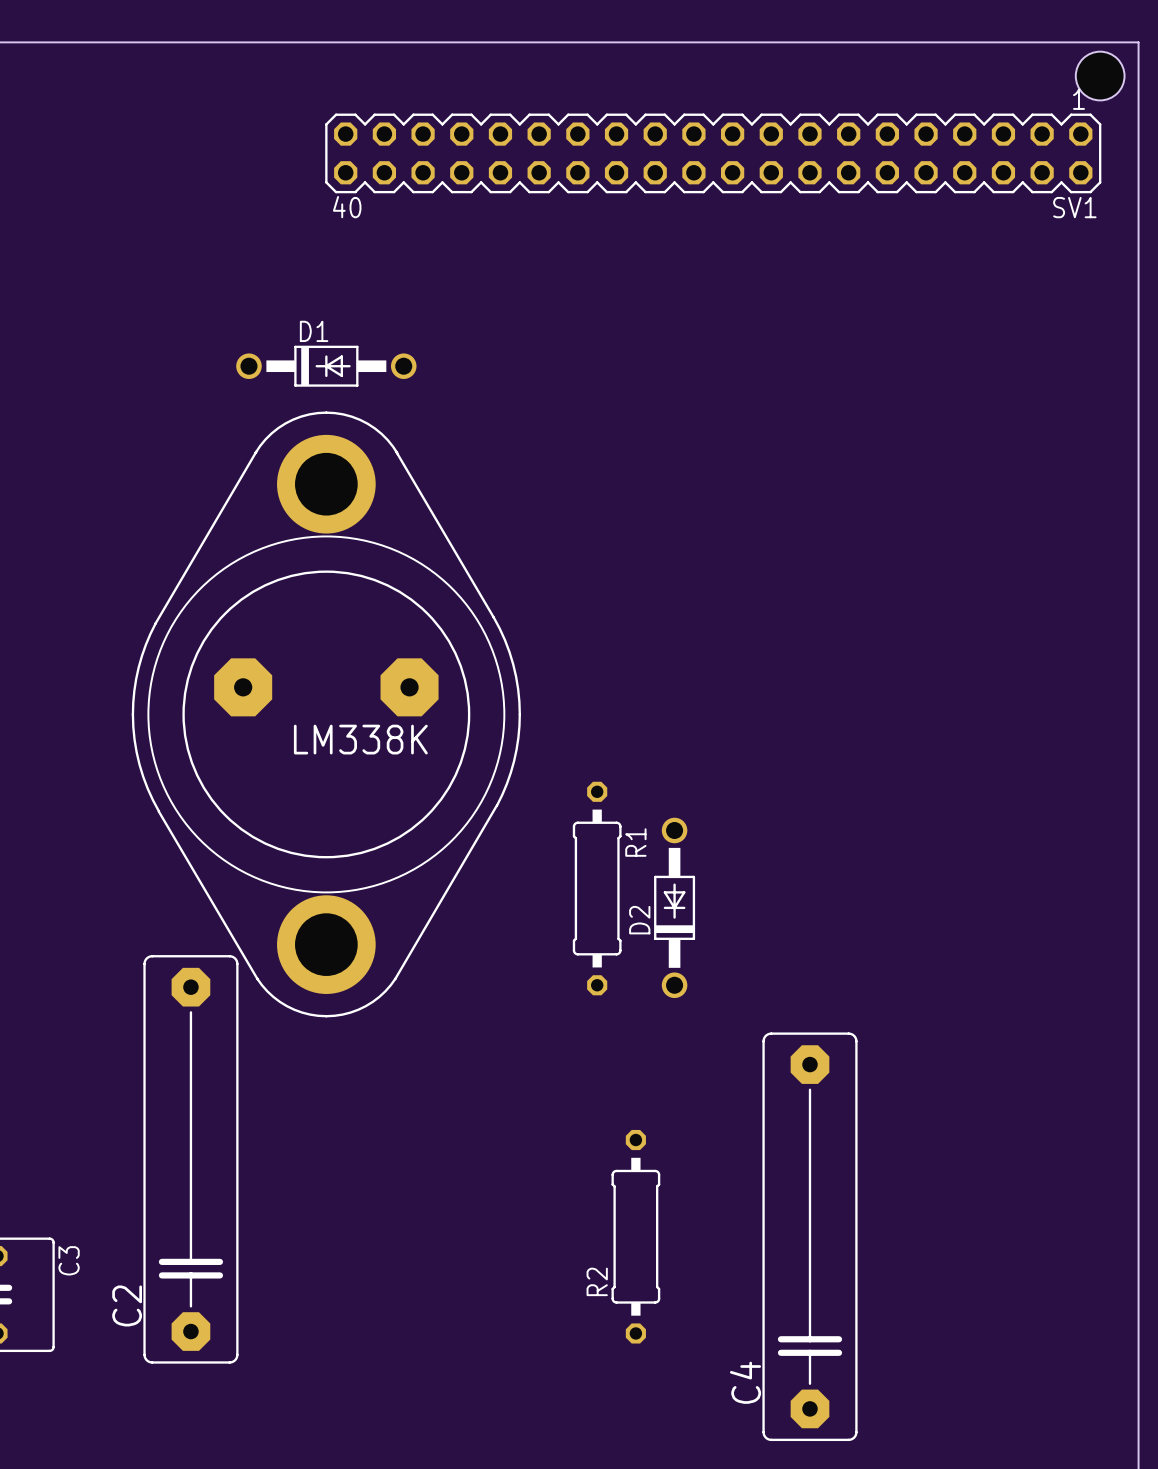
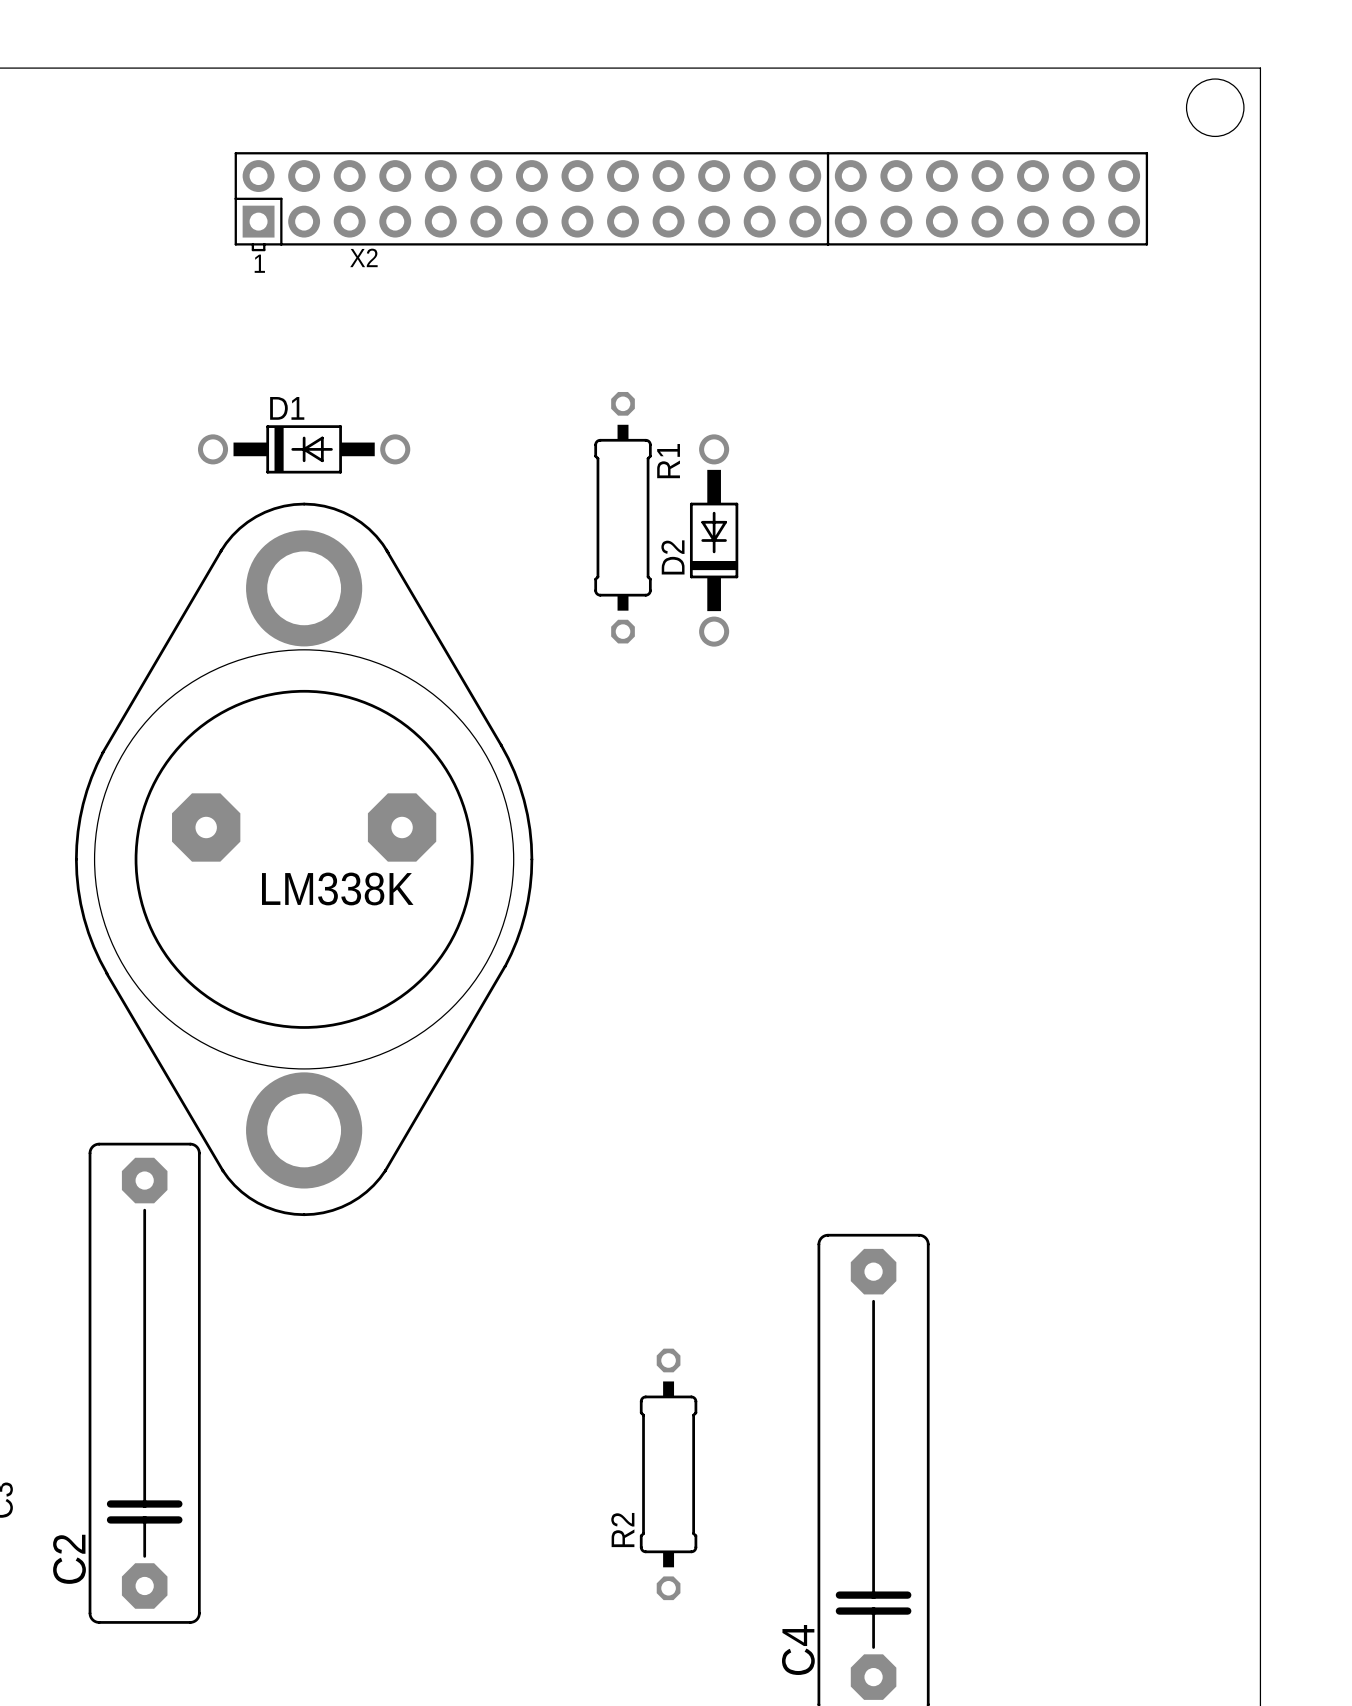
SV1: (713, 153) -> none
X2: none -> (691, 201)
R1 position: (597, 888) -> (623, 517)
D2 position: (674, 907) -> (714, 540)

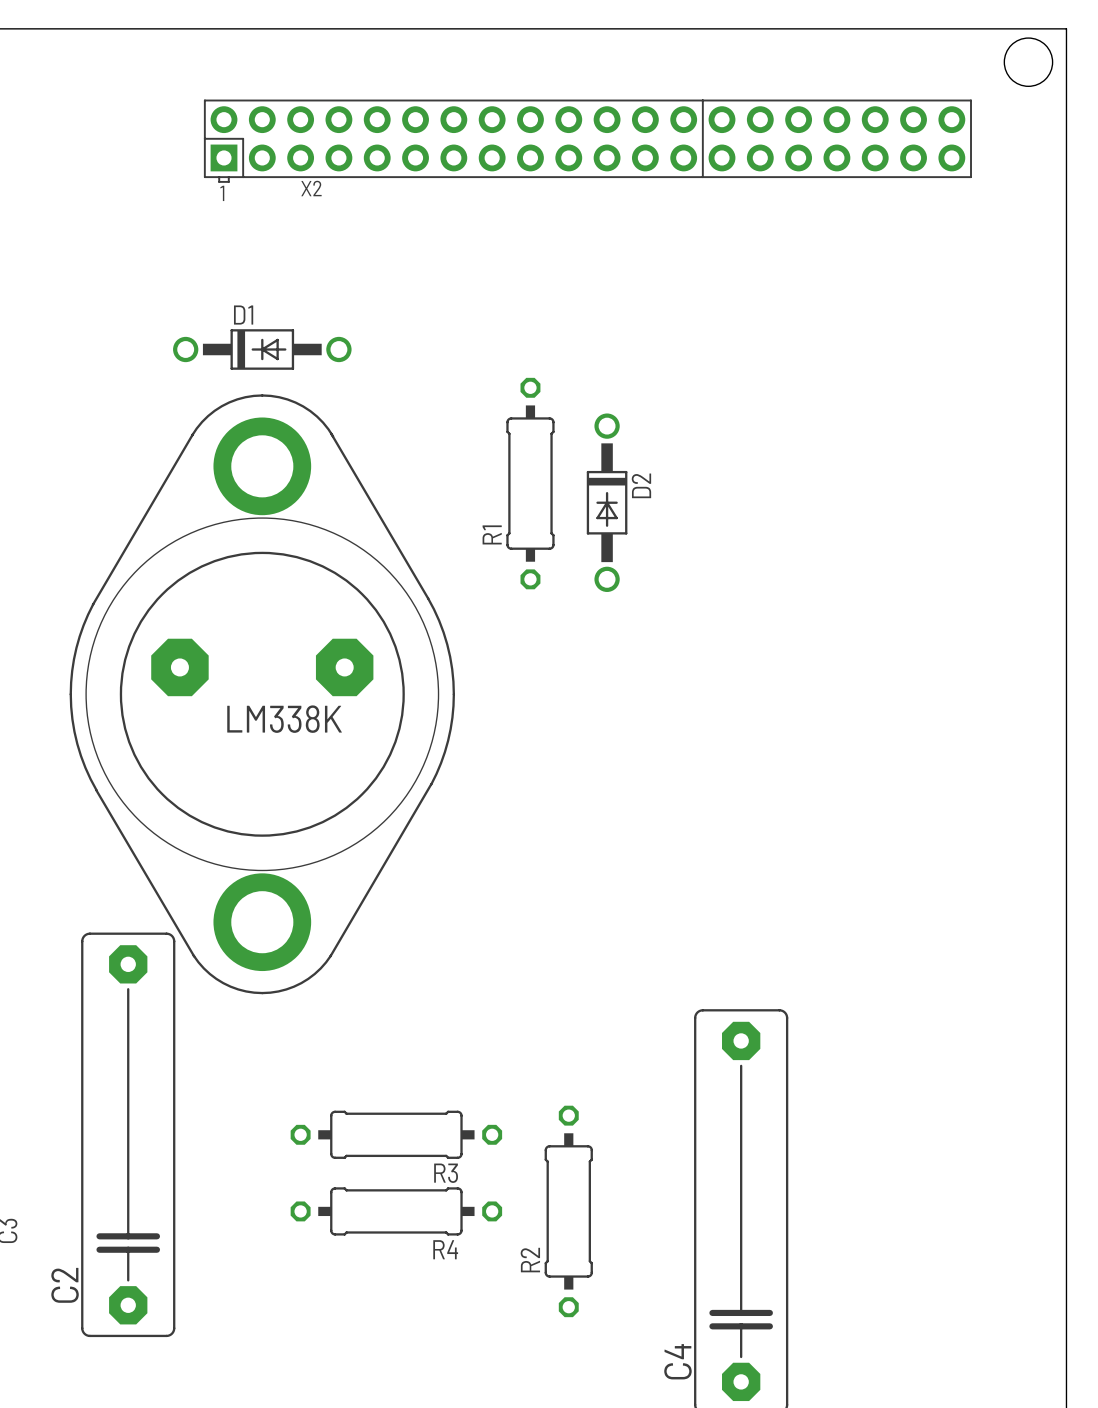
R1 name position: R1 (668, 461) -> R1 (492, 534)
R1 position: (623, 517) -> (530, 483)
D2 rotation: 0° (714, 540) -> 180° (607, 502)
R3: none -> (396, 1134)
R4: none -> (396, 1211)

